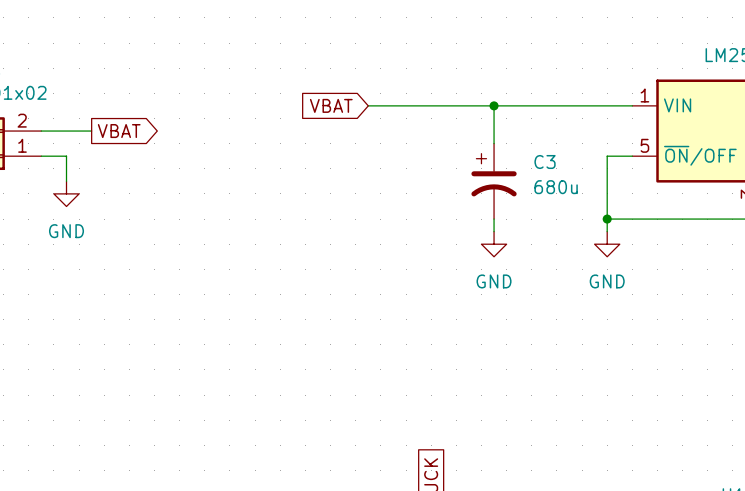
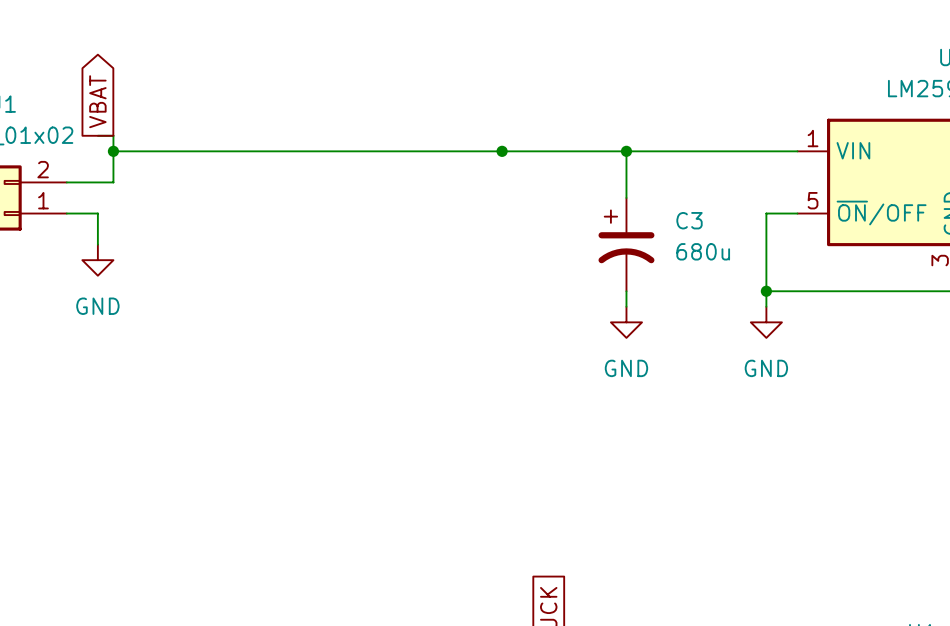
wire: none -> (113, 151) (471, 151)
junction: none -> (113, 151)
global label: VBAT (331, 105) -> none
junction: none -> (502, 151)
wire: (79, 131) (91, 131) -> (113, 182) (113, 135) (97, 135)
global label rotation: 0° (119, 131) -> 90° counterclockwise (97, 101)
global label position: VBAT (119, 131) -> VBAT (97, 101)

